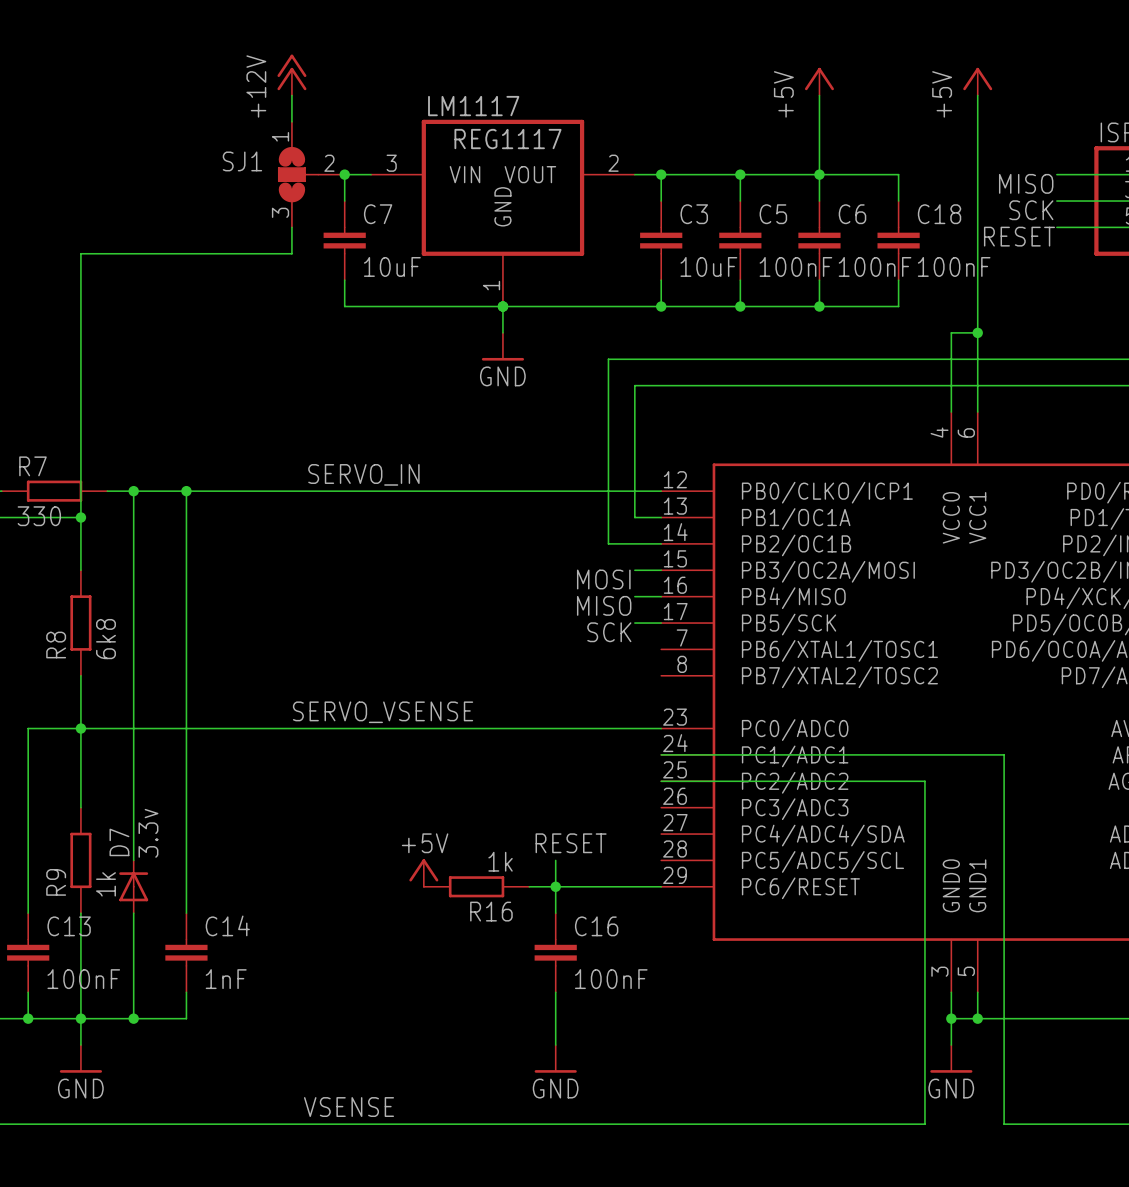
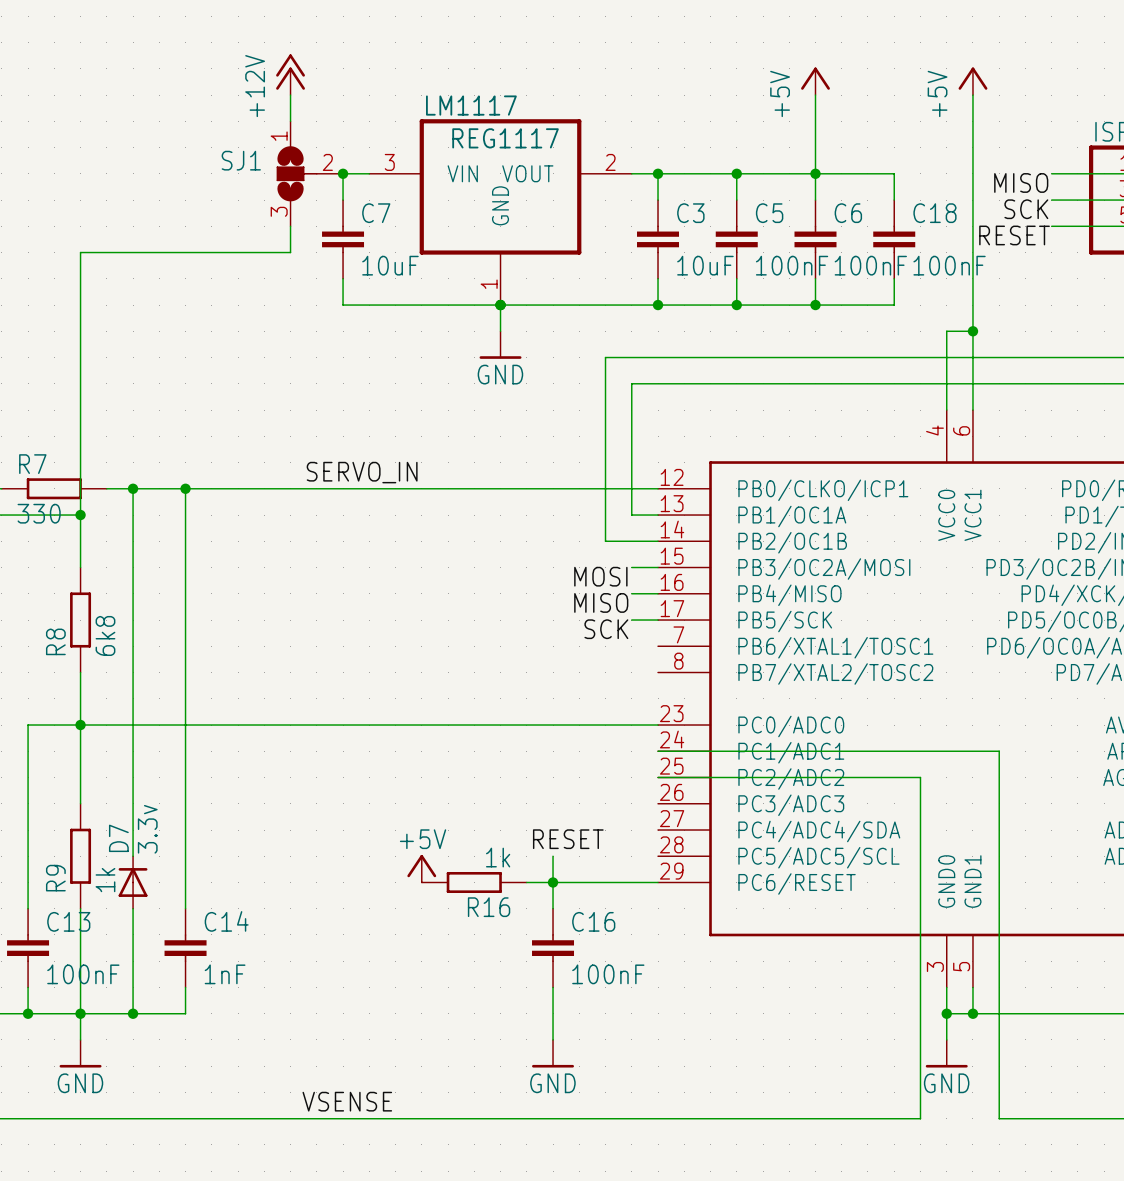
label: SERVO_VSENSE (383, 712) -> none

